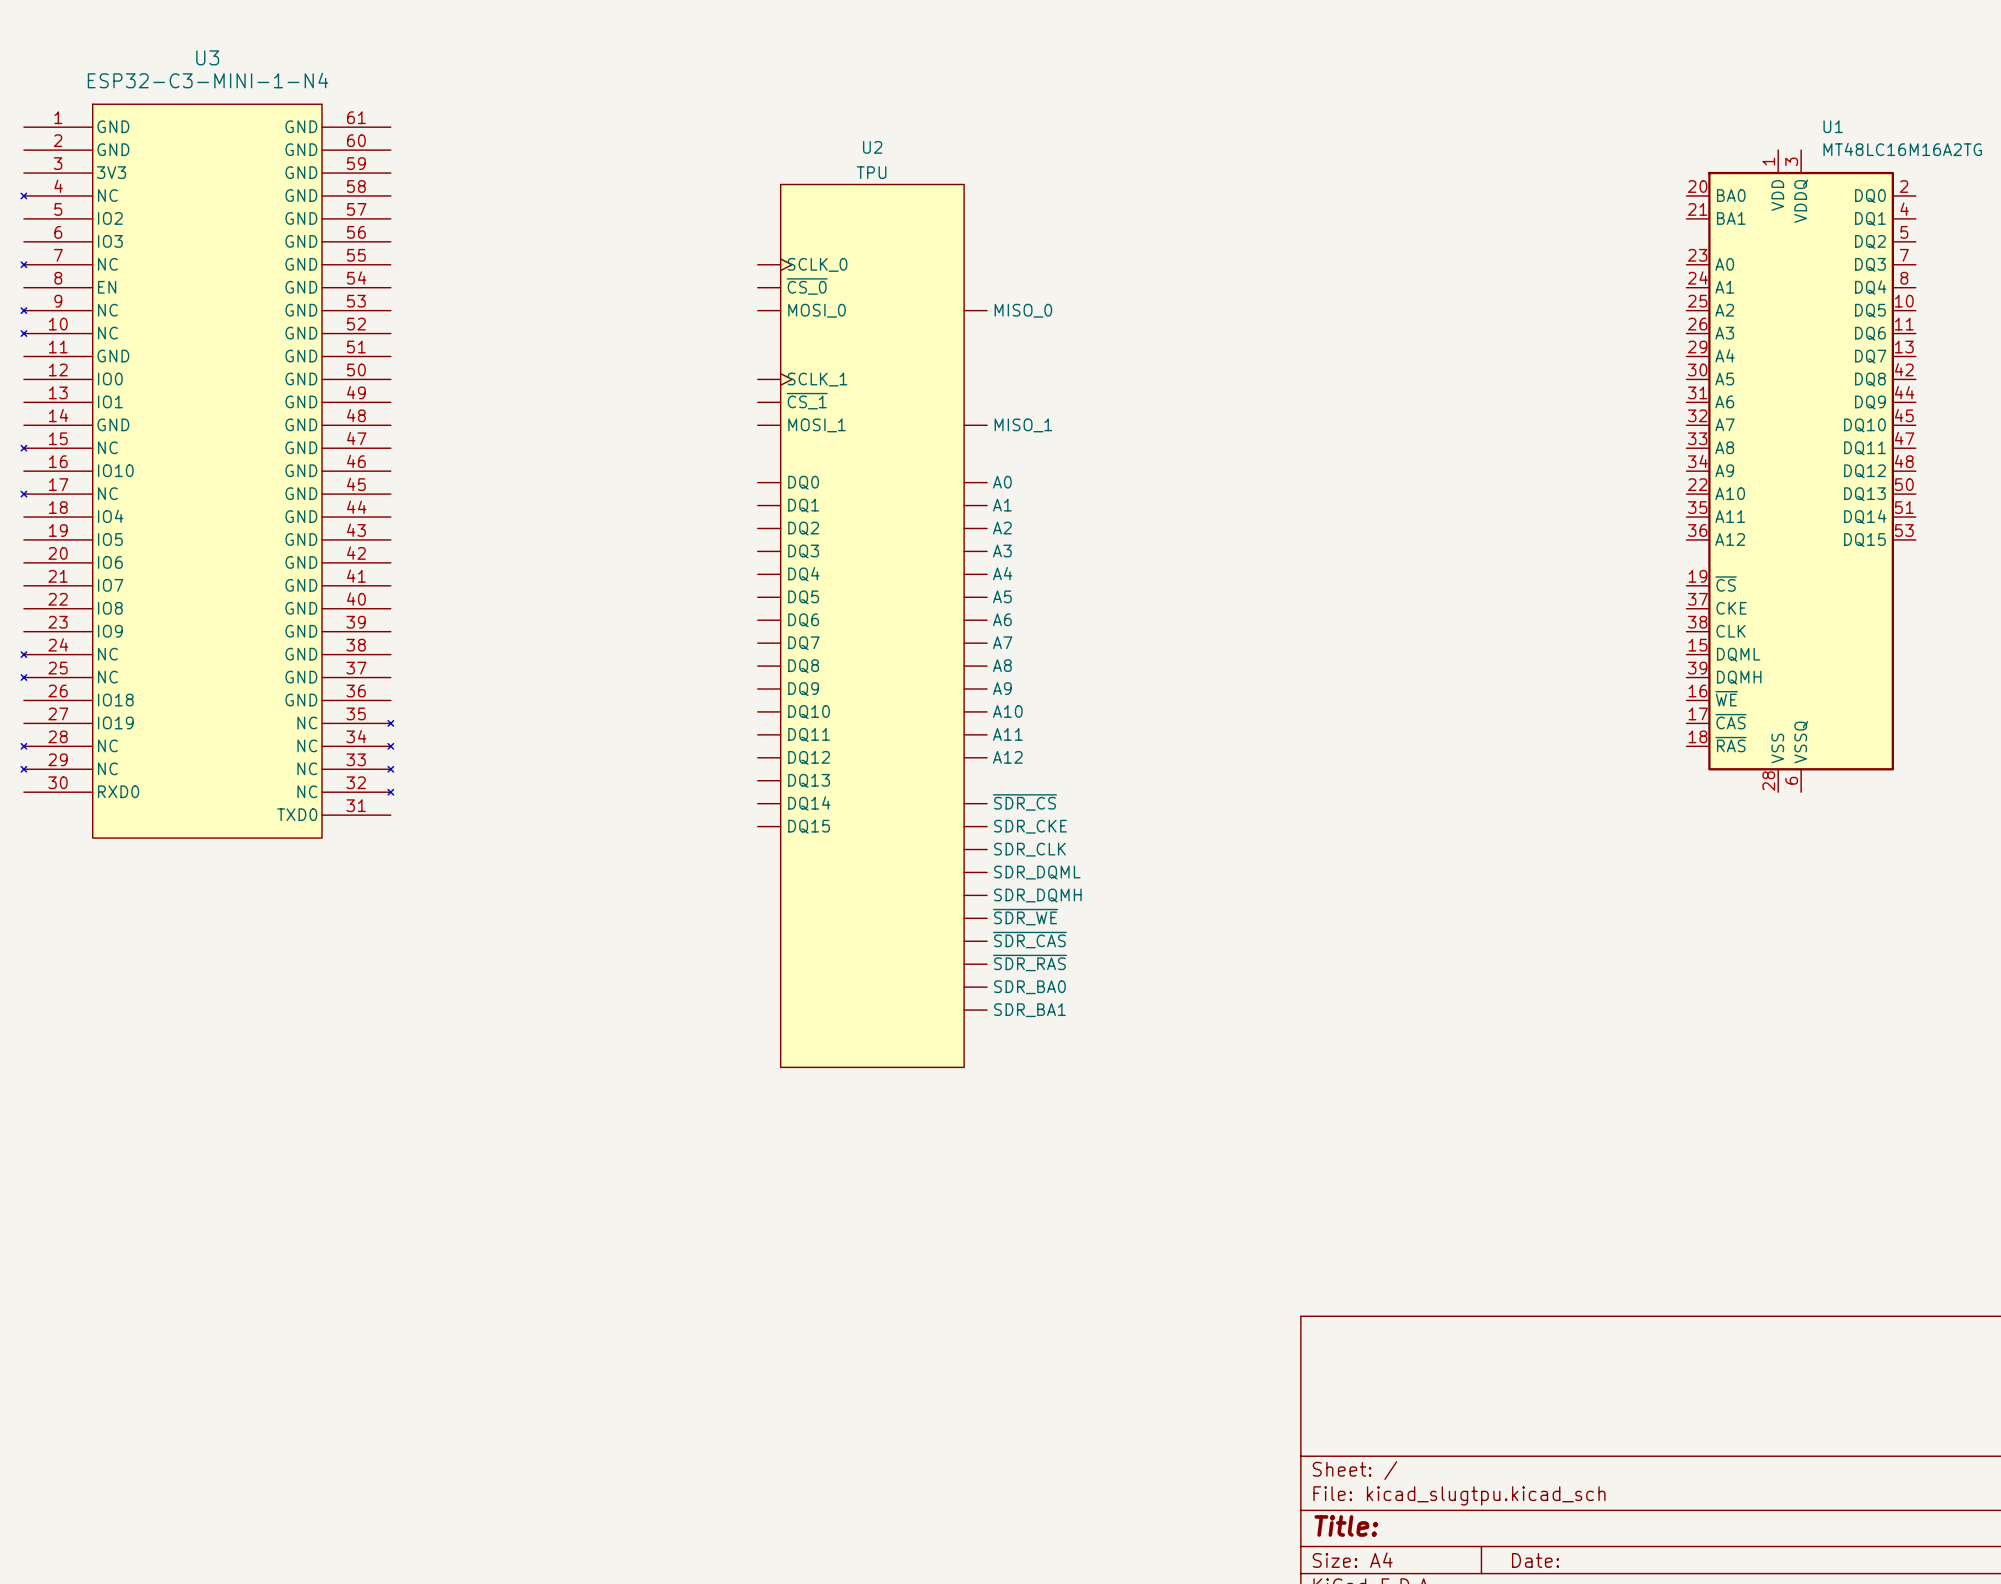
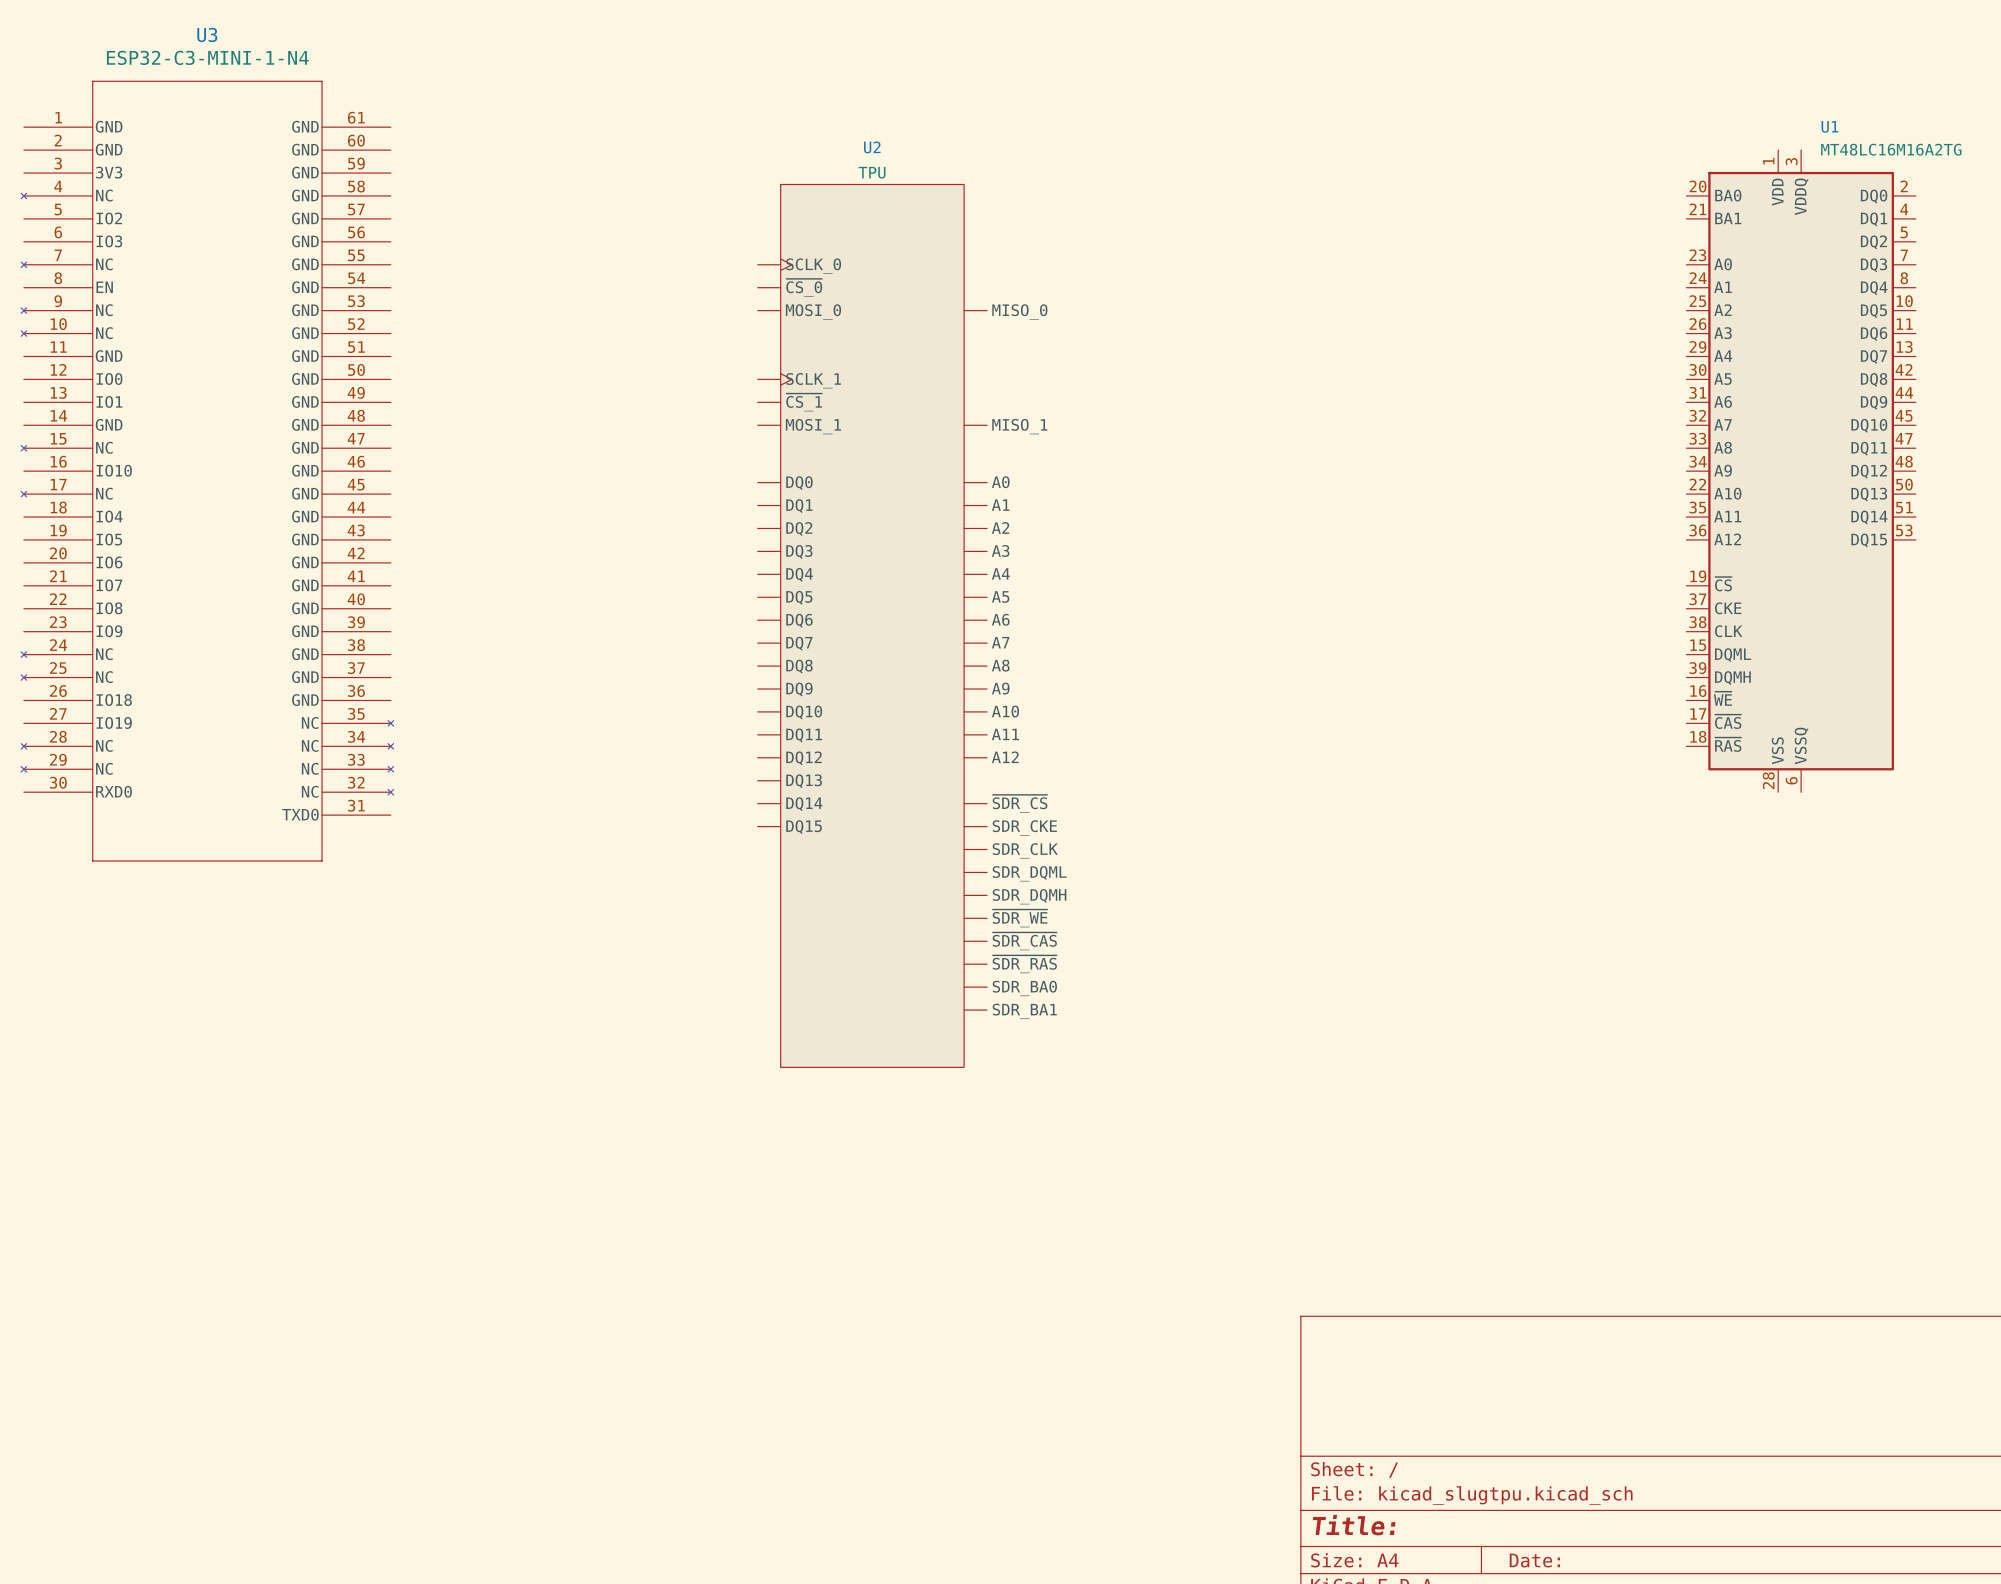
U3 name position: U3 (207, 57) -> U3 (207, 34)
U3 value position: ESP32-C3-MINI-1-N4 (208, 80) -> ESP32-C3-MINI-1-N4 (207, 57)
U3 symbol: [21, 104, 394, 839] -> [21, 80, 394, 862]

